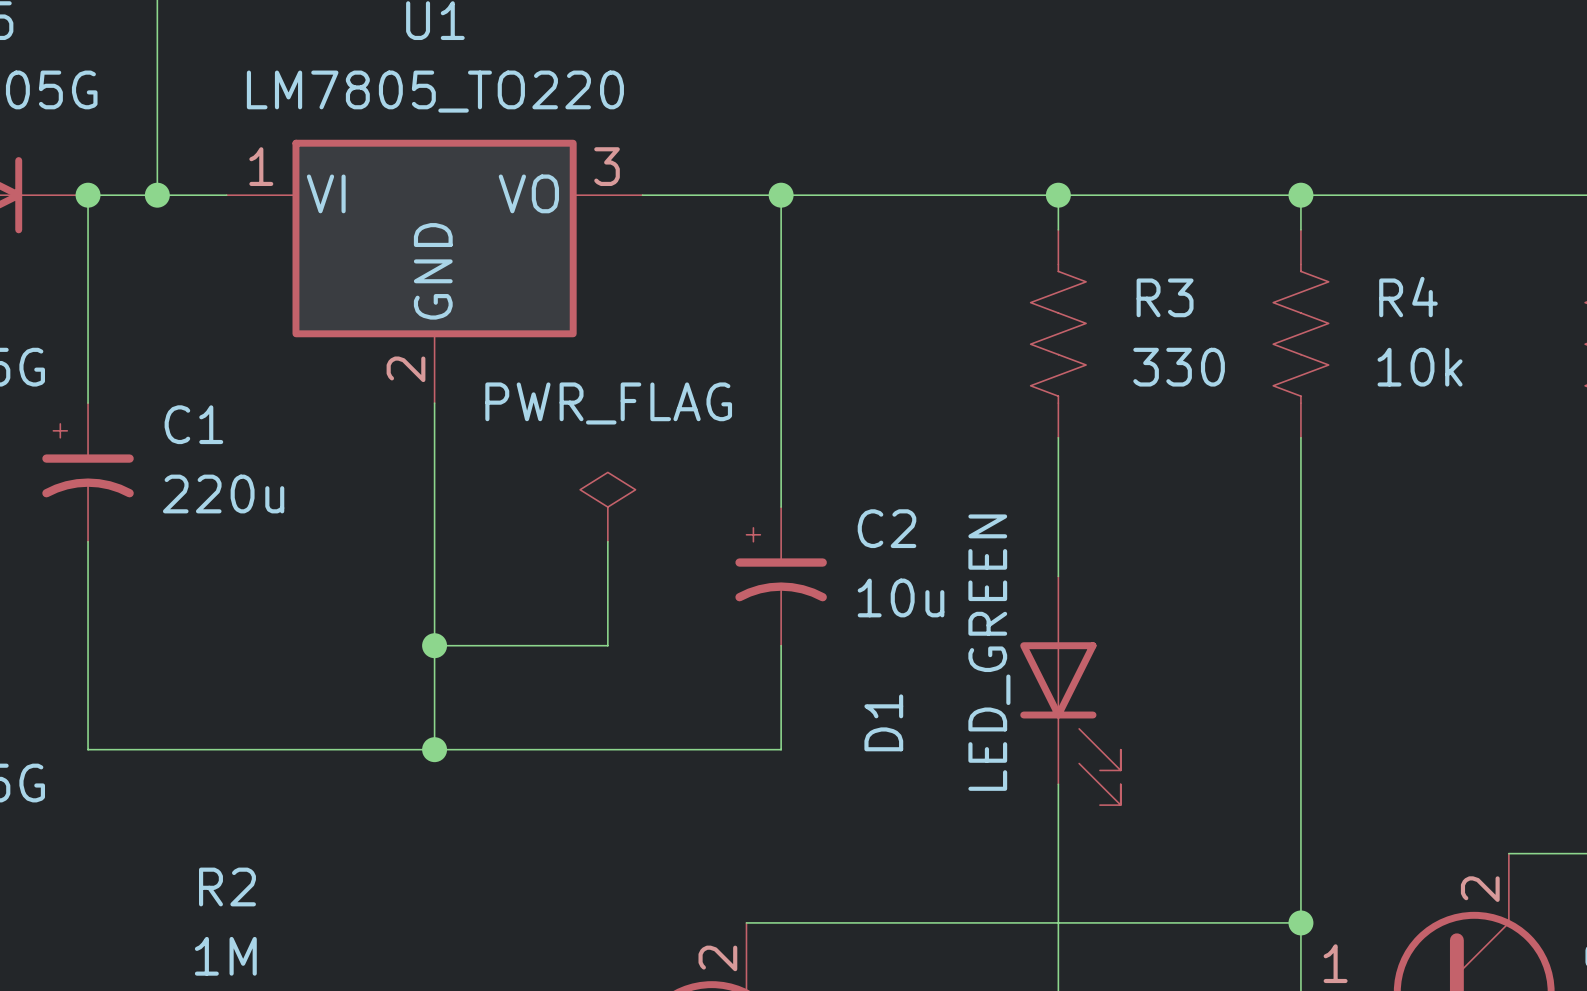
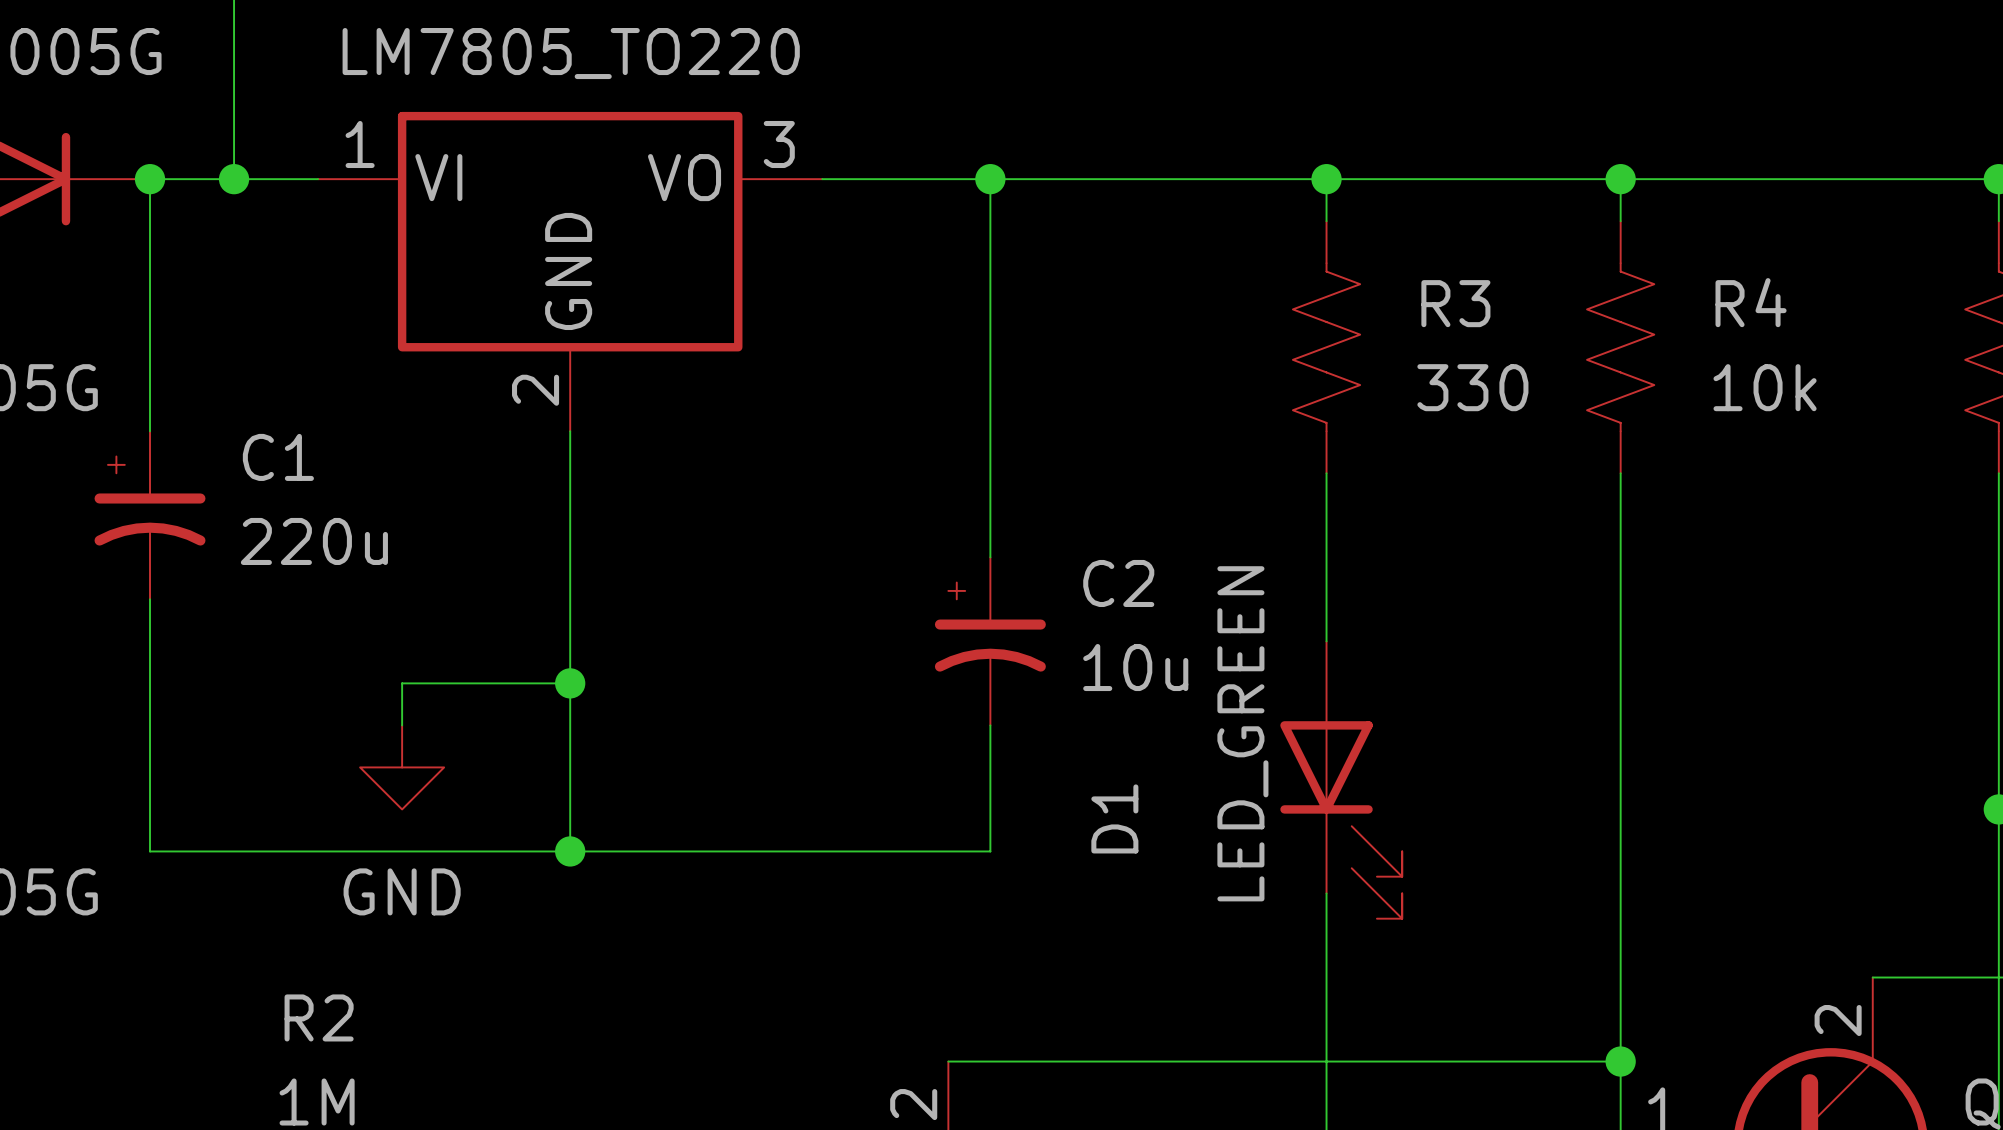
power symbol: PWR_FLAG (607, 507) -> none
wire: (607, 541) (607, 645) (434, 645) -> none
wire: none -> (570, 683) (402, 683) (402, 725)
junction position: (434, 645) -> (570, 683)
power symbol: none -> GND (402, 767)

